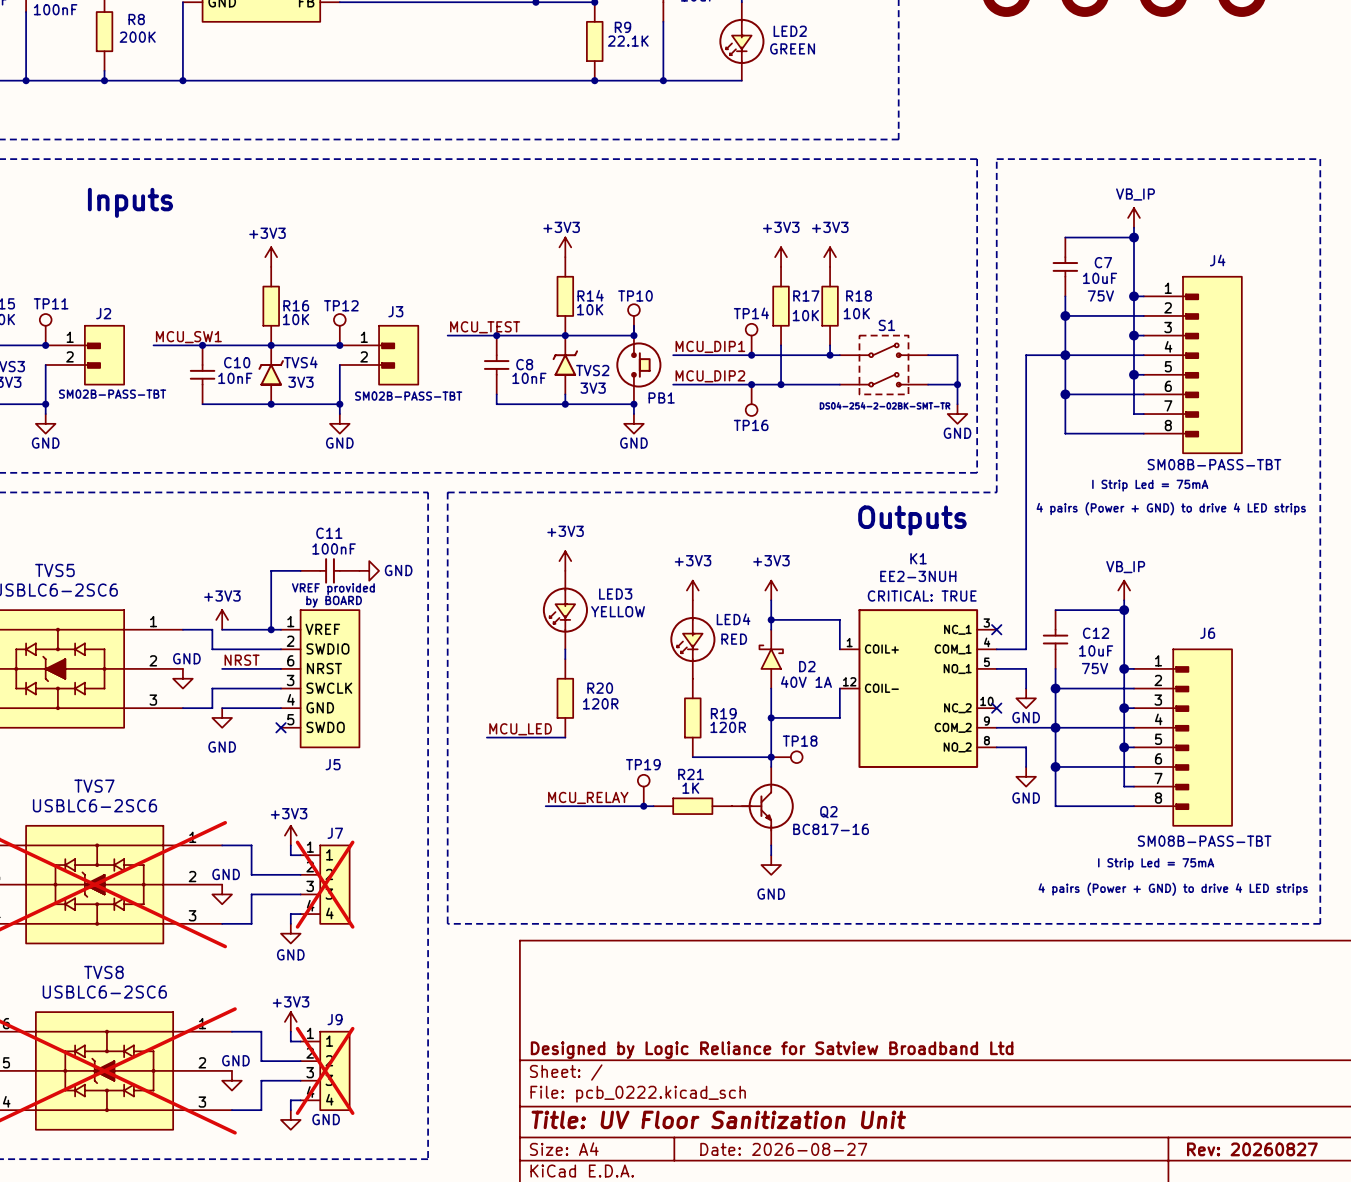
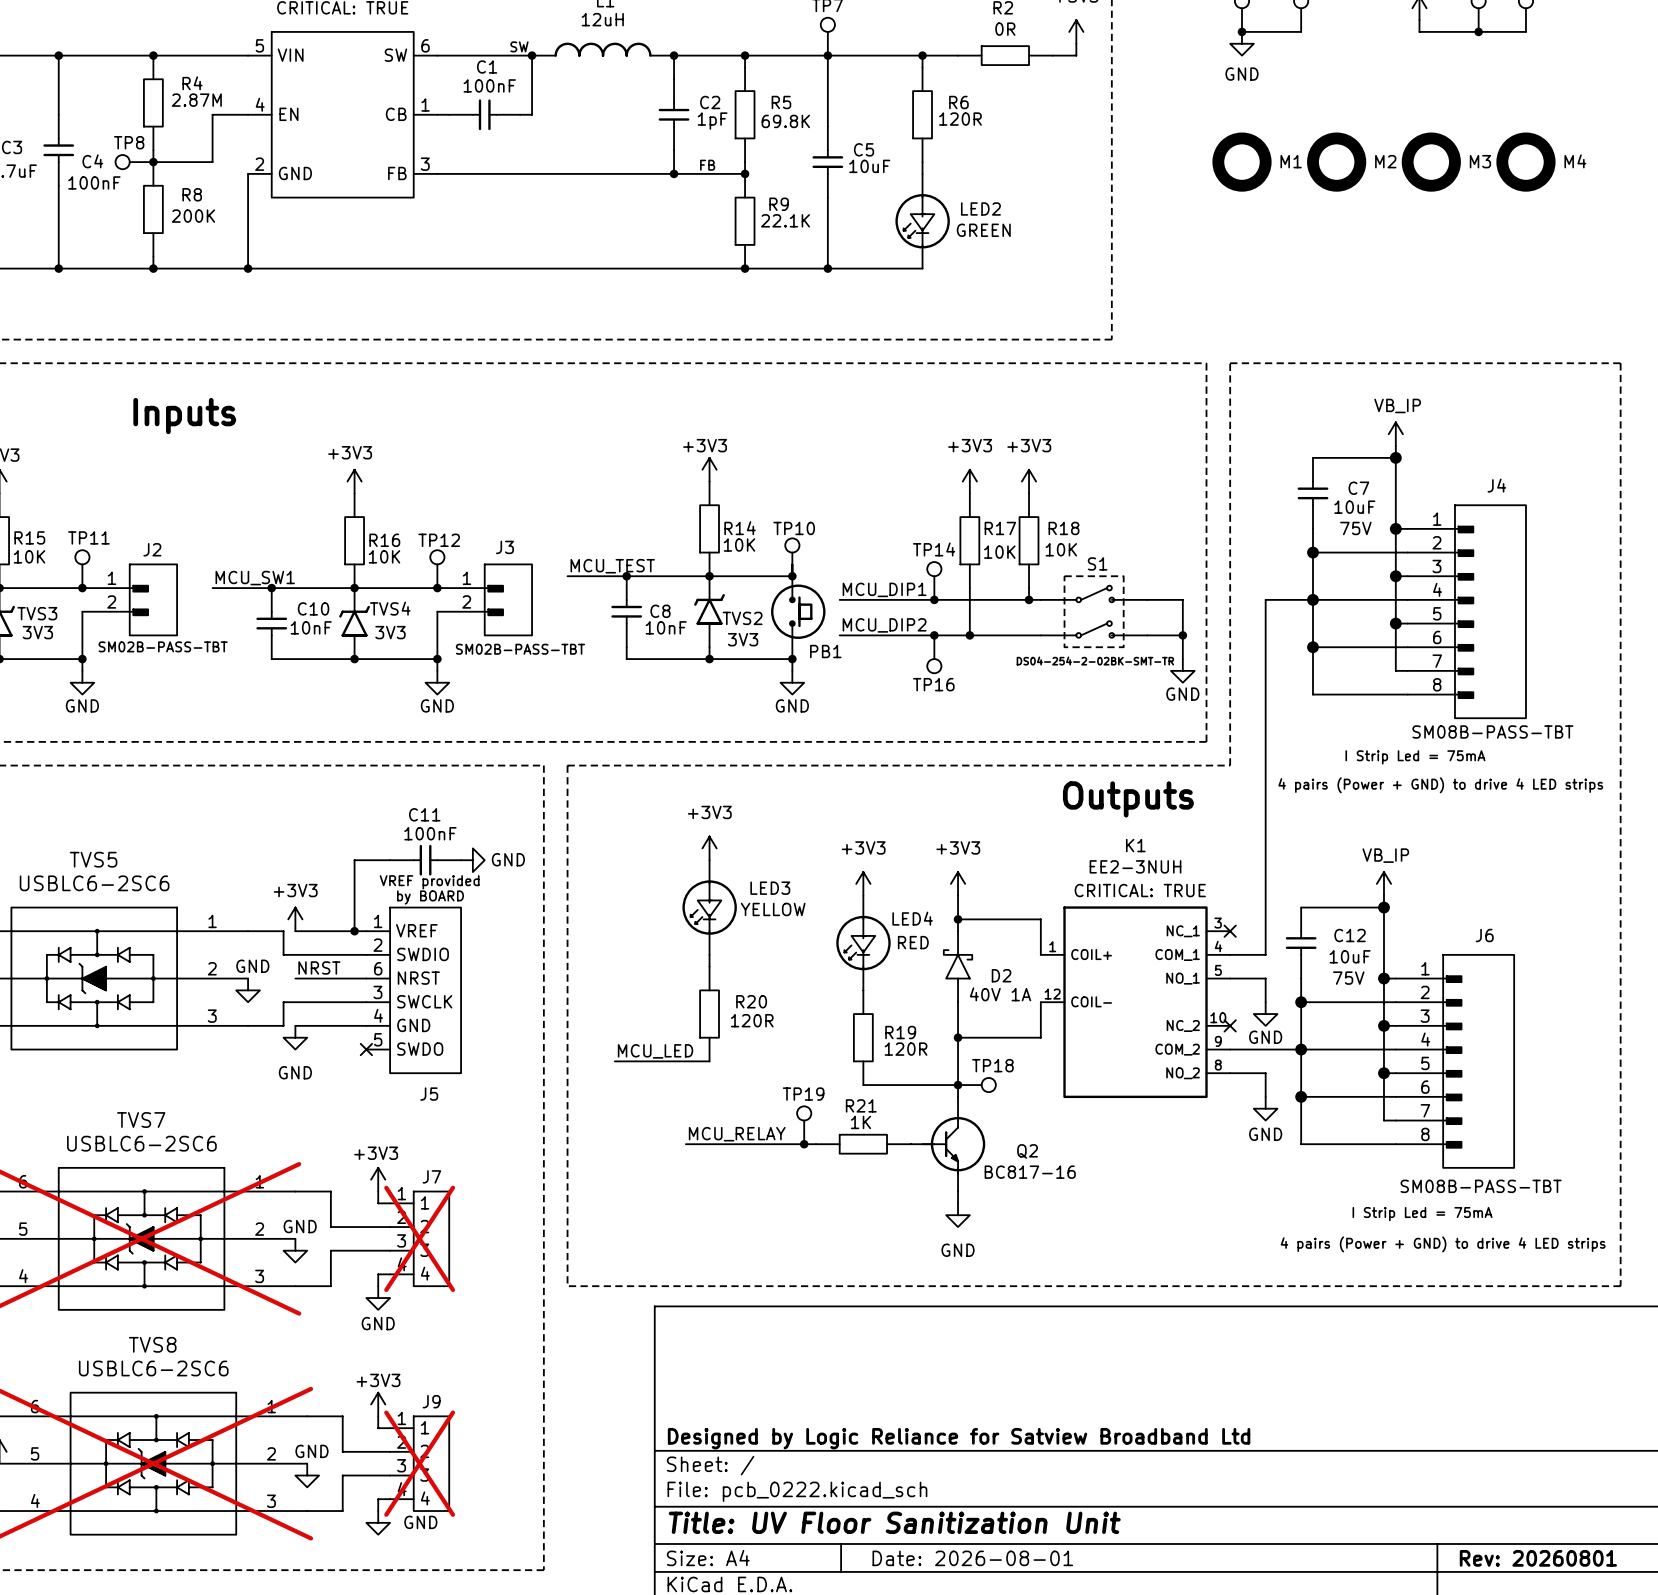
title block: Date: 2026-08-27 (783, 1149) -> Date: 2026-08-01 (972, 1558)
title block: Rev: 20260827 (1252, 1149) -> Rev: 20260801 (1538, 1558)

